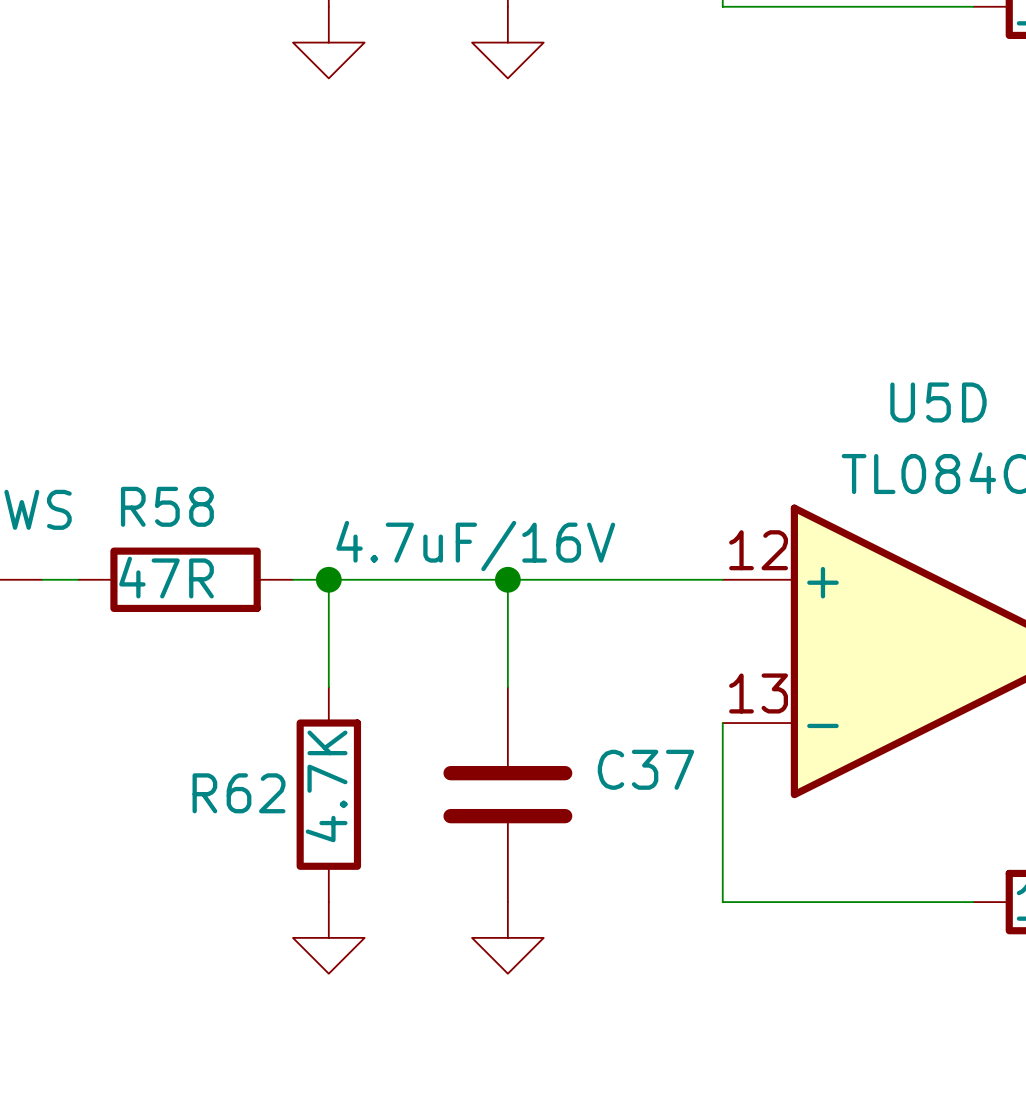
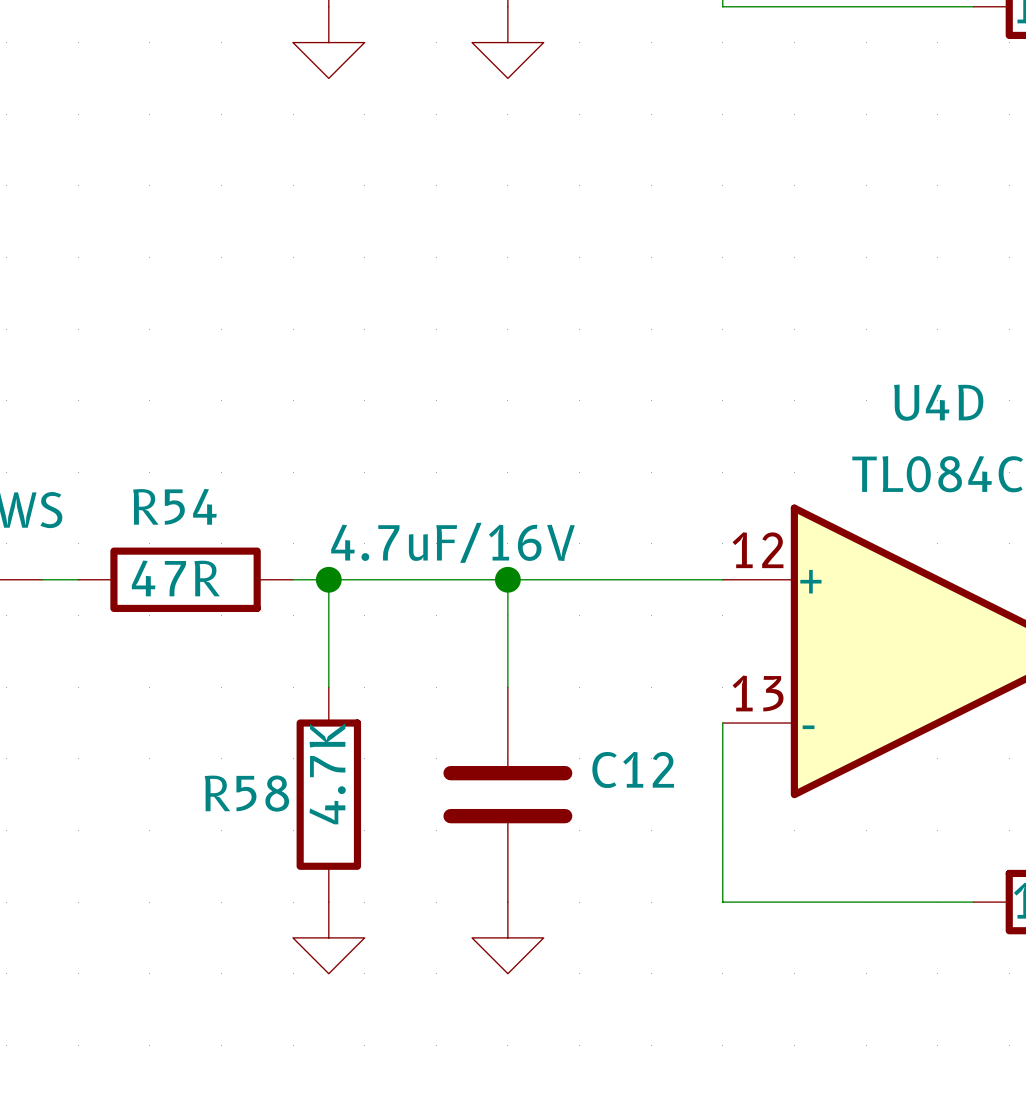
U5D name: U5D (938, 402) -> U4D (938, 402)
R58 name: R58 (167, 506) -> R54 (174, 506)
C37 name: C37 (645, 769) -> C12 (633, 769)
R62 name: R62 (239, 793) -> R58 (246, 793)

